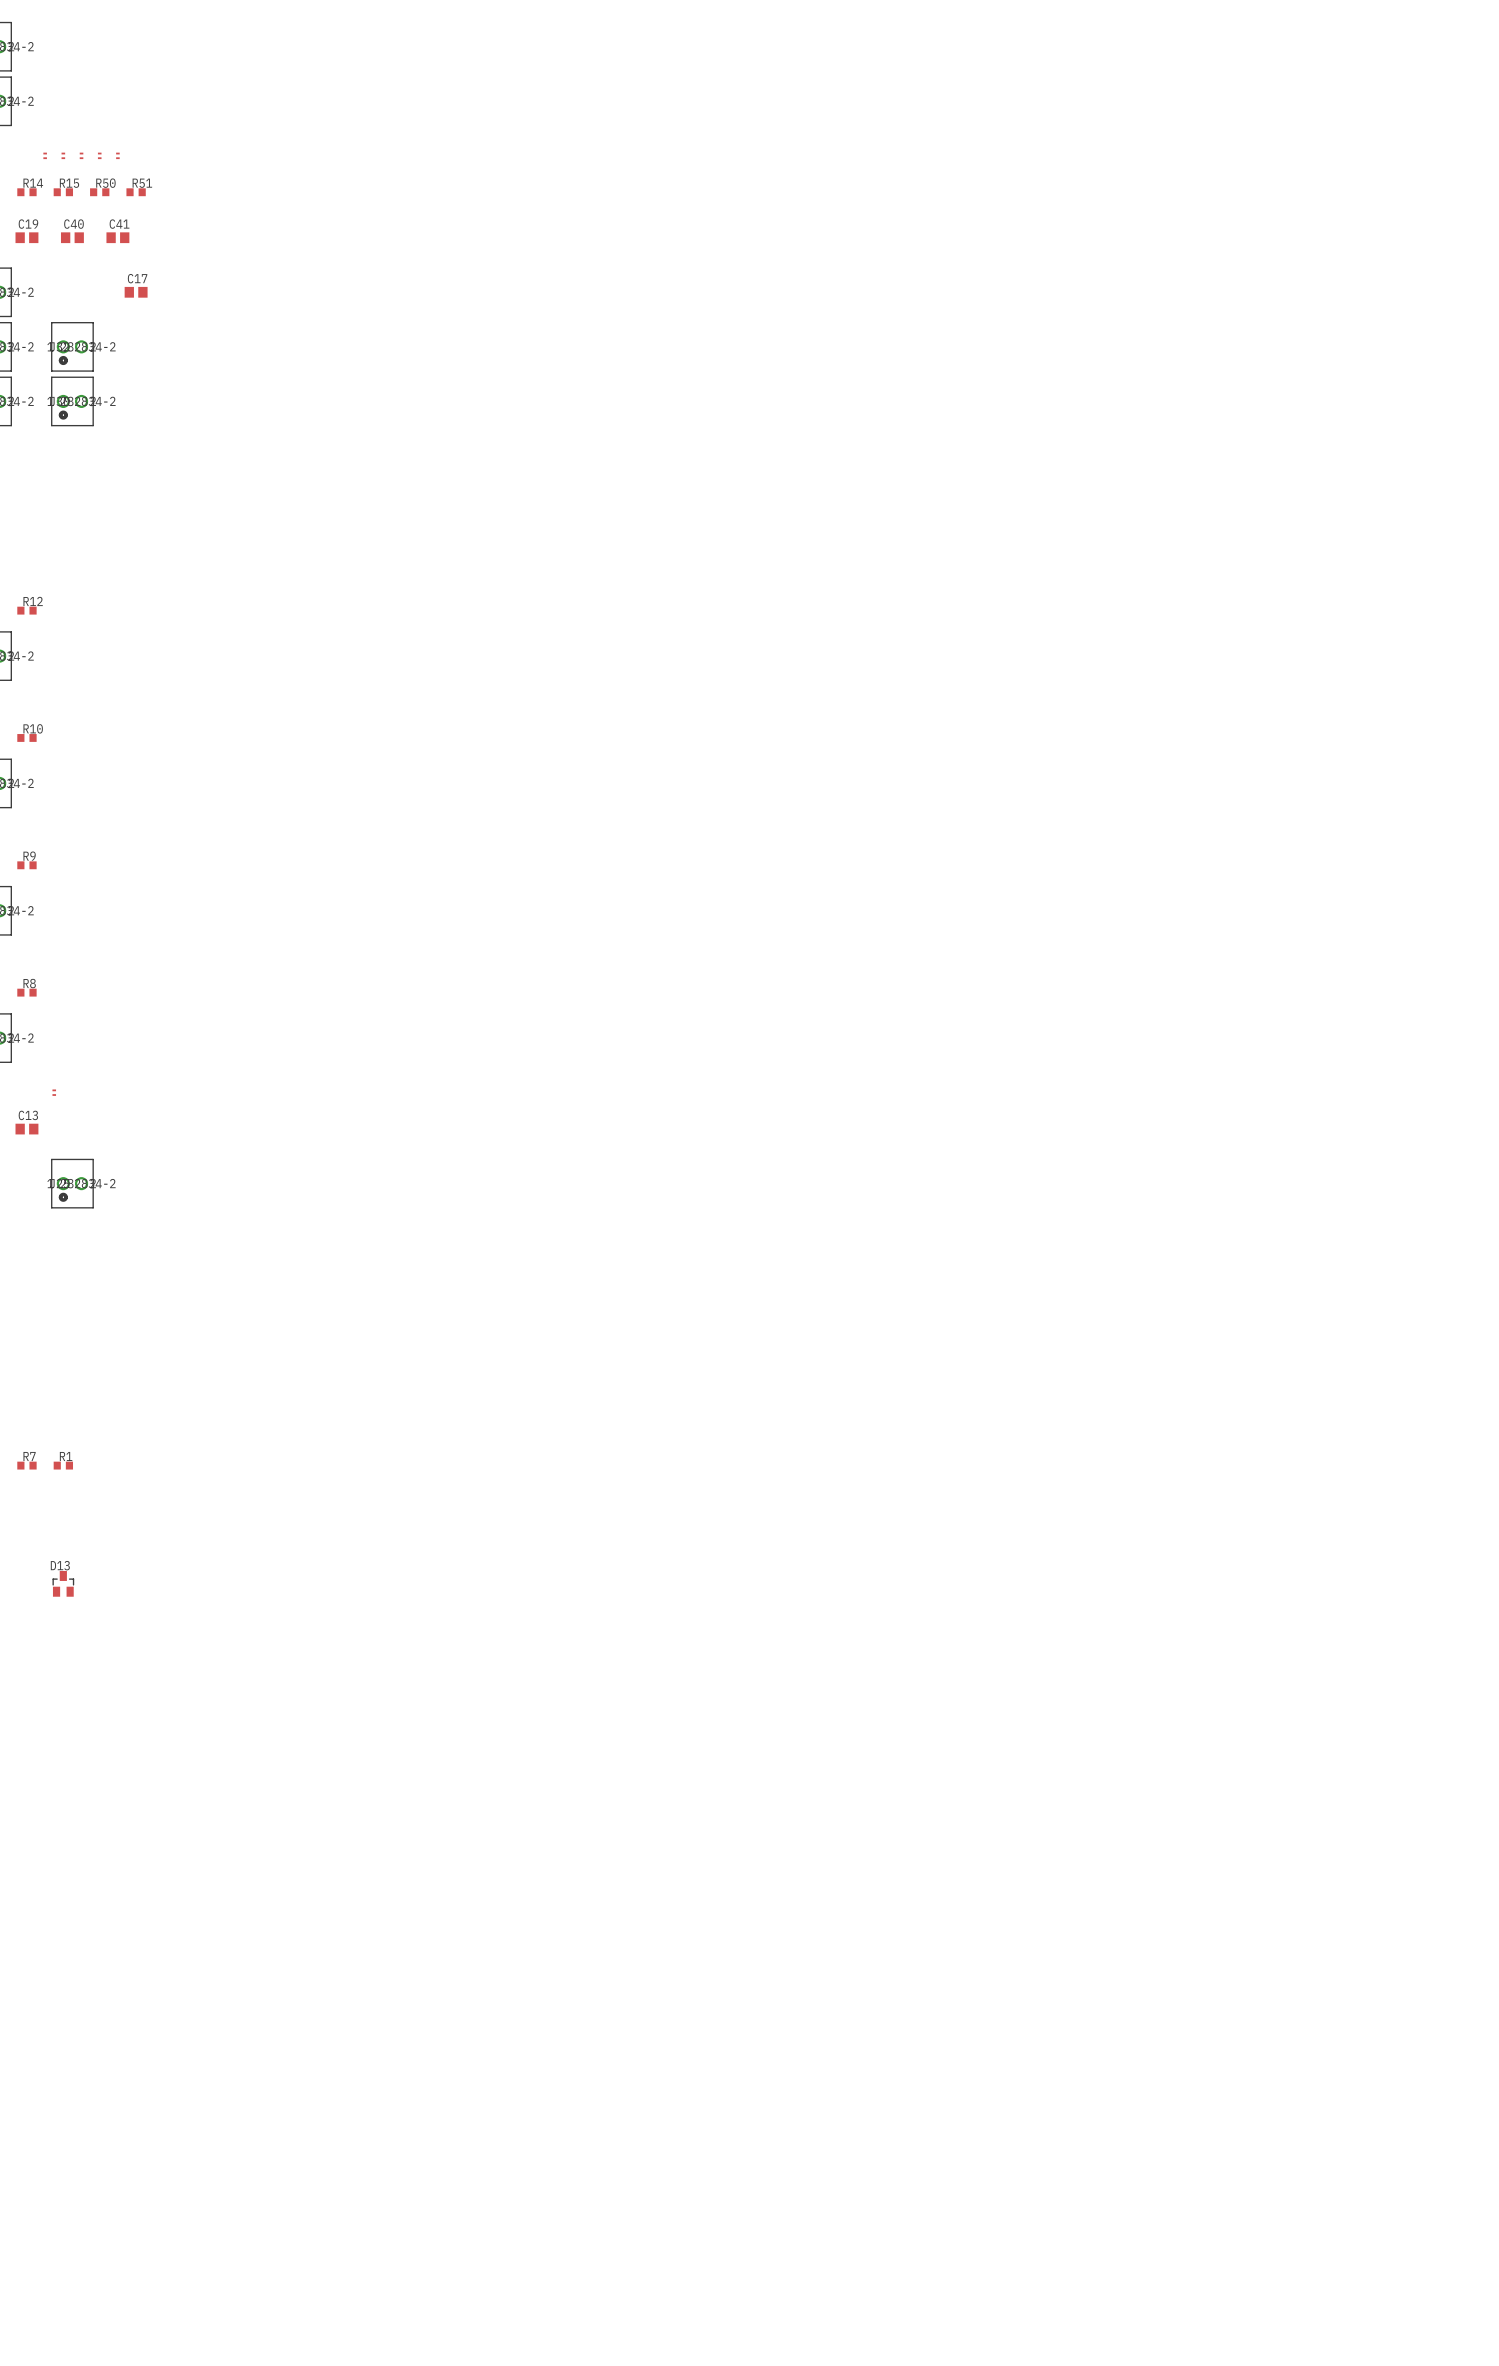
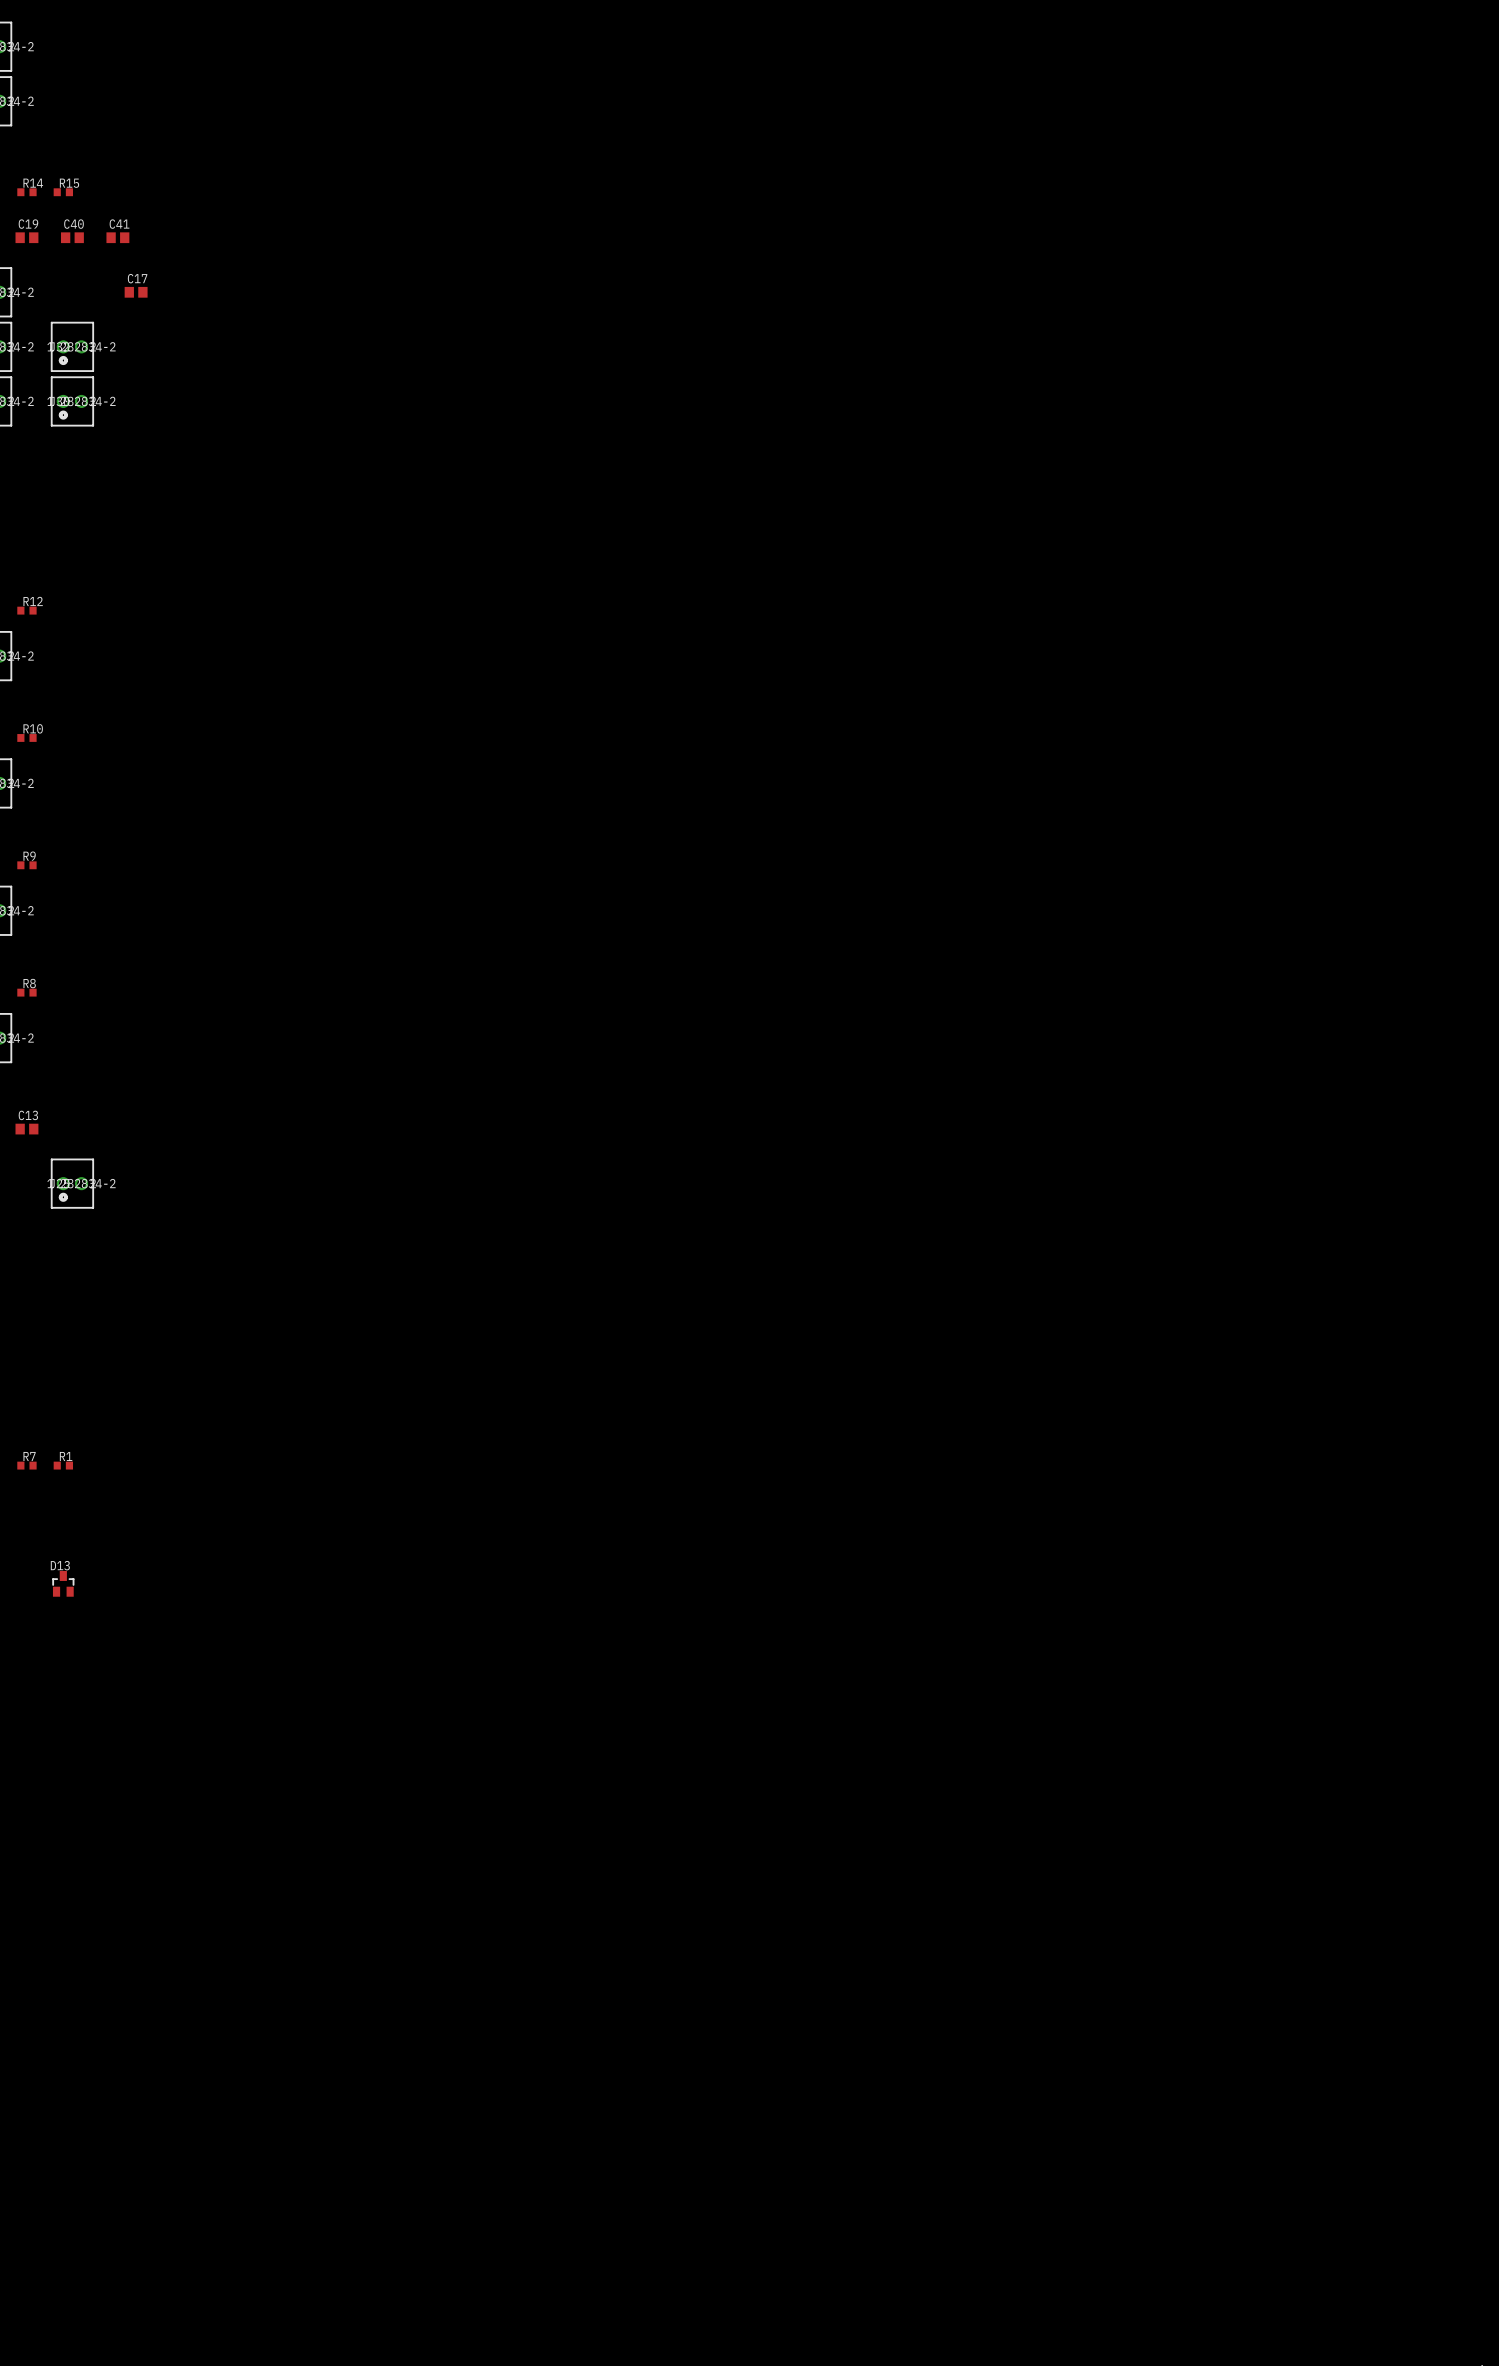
part: (45, 155) -> none
part: (63, 155) -> none
part: (81, 155) -> none
part: (99, 155) -> none
part: (117, 155) -> none
R50: (99, 192) -> none
R51: (136, 192) -> none
part: (54, 1092) -> none

